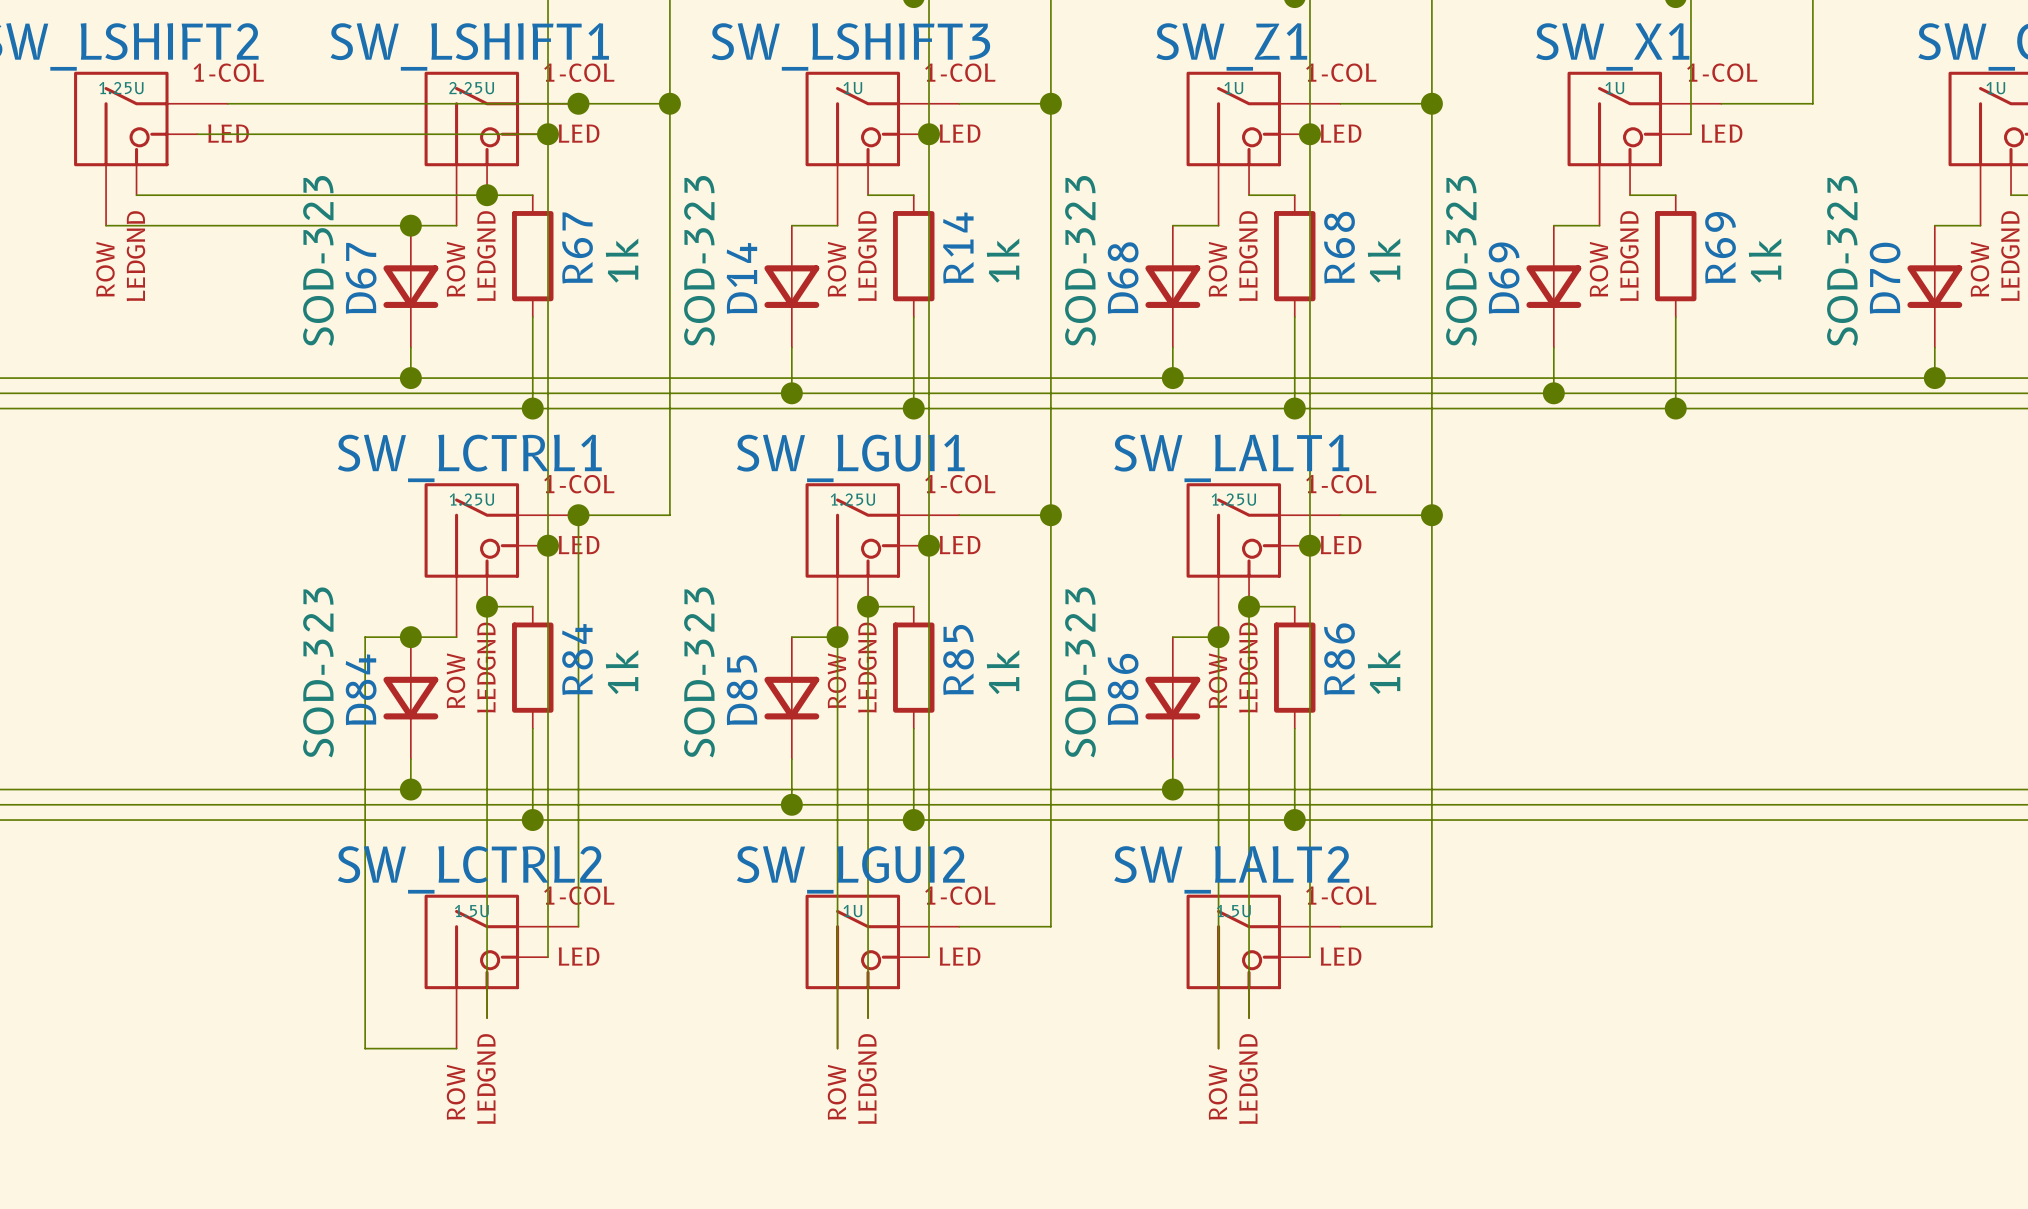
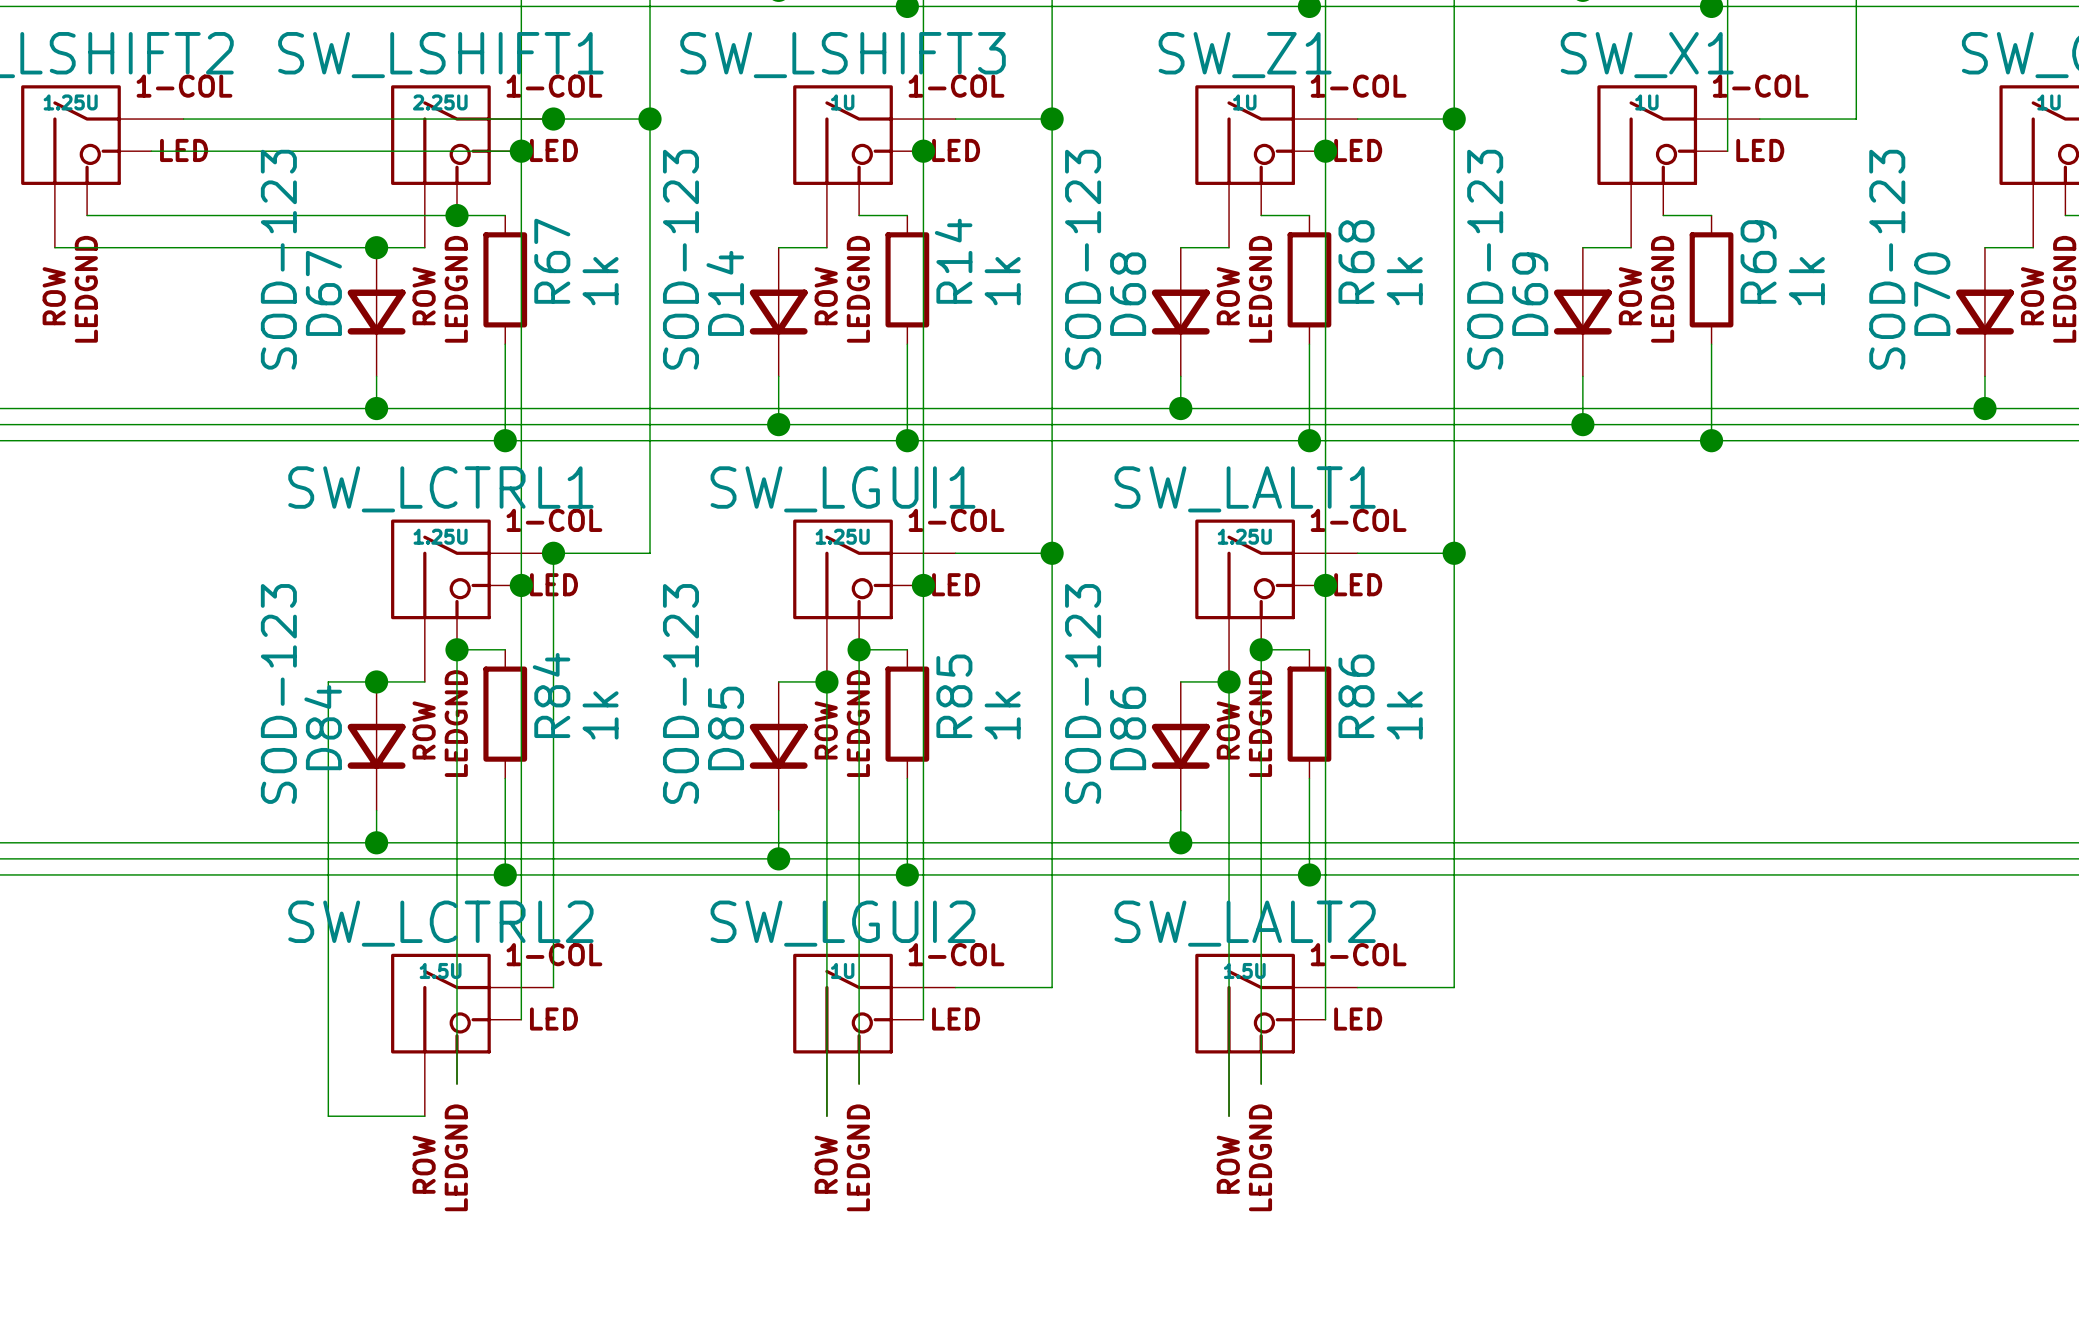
D67 value: SOD-323 (318, 260) -> SOD-123 (278, 259)
D14 value: SOD-323 (699, 260) -> SOD-123 (680, 259)
D68 value: SOD-323 (1080, 260) -> SOD-123 (1083, 259)
D69 value: SOD-323 (1461, 260) -> SOD-123 (1485, 259)
D70 value: SOD-323 (1842, 260) -> SOD-123 (1887, 259)
D84 value: SOD-323 (318, 672) -> SOD-123 (278, 693)
D85 value: SOD-323 (699, 672) -> SOD-123 (680, 693)
D86 value: SOD-323 (1080, 672) -> SOD-123 (1083, 693)

